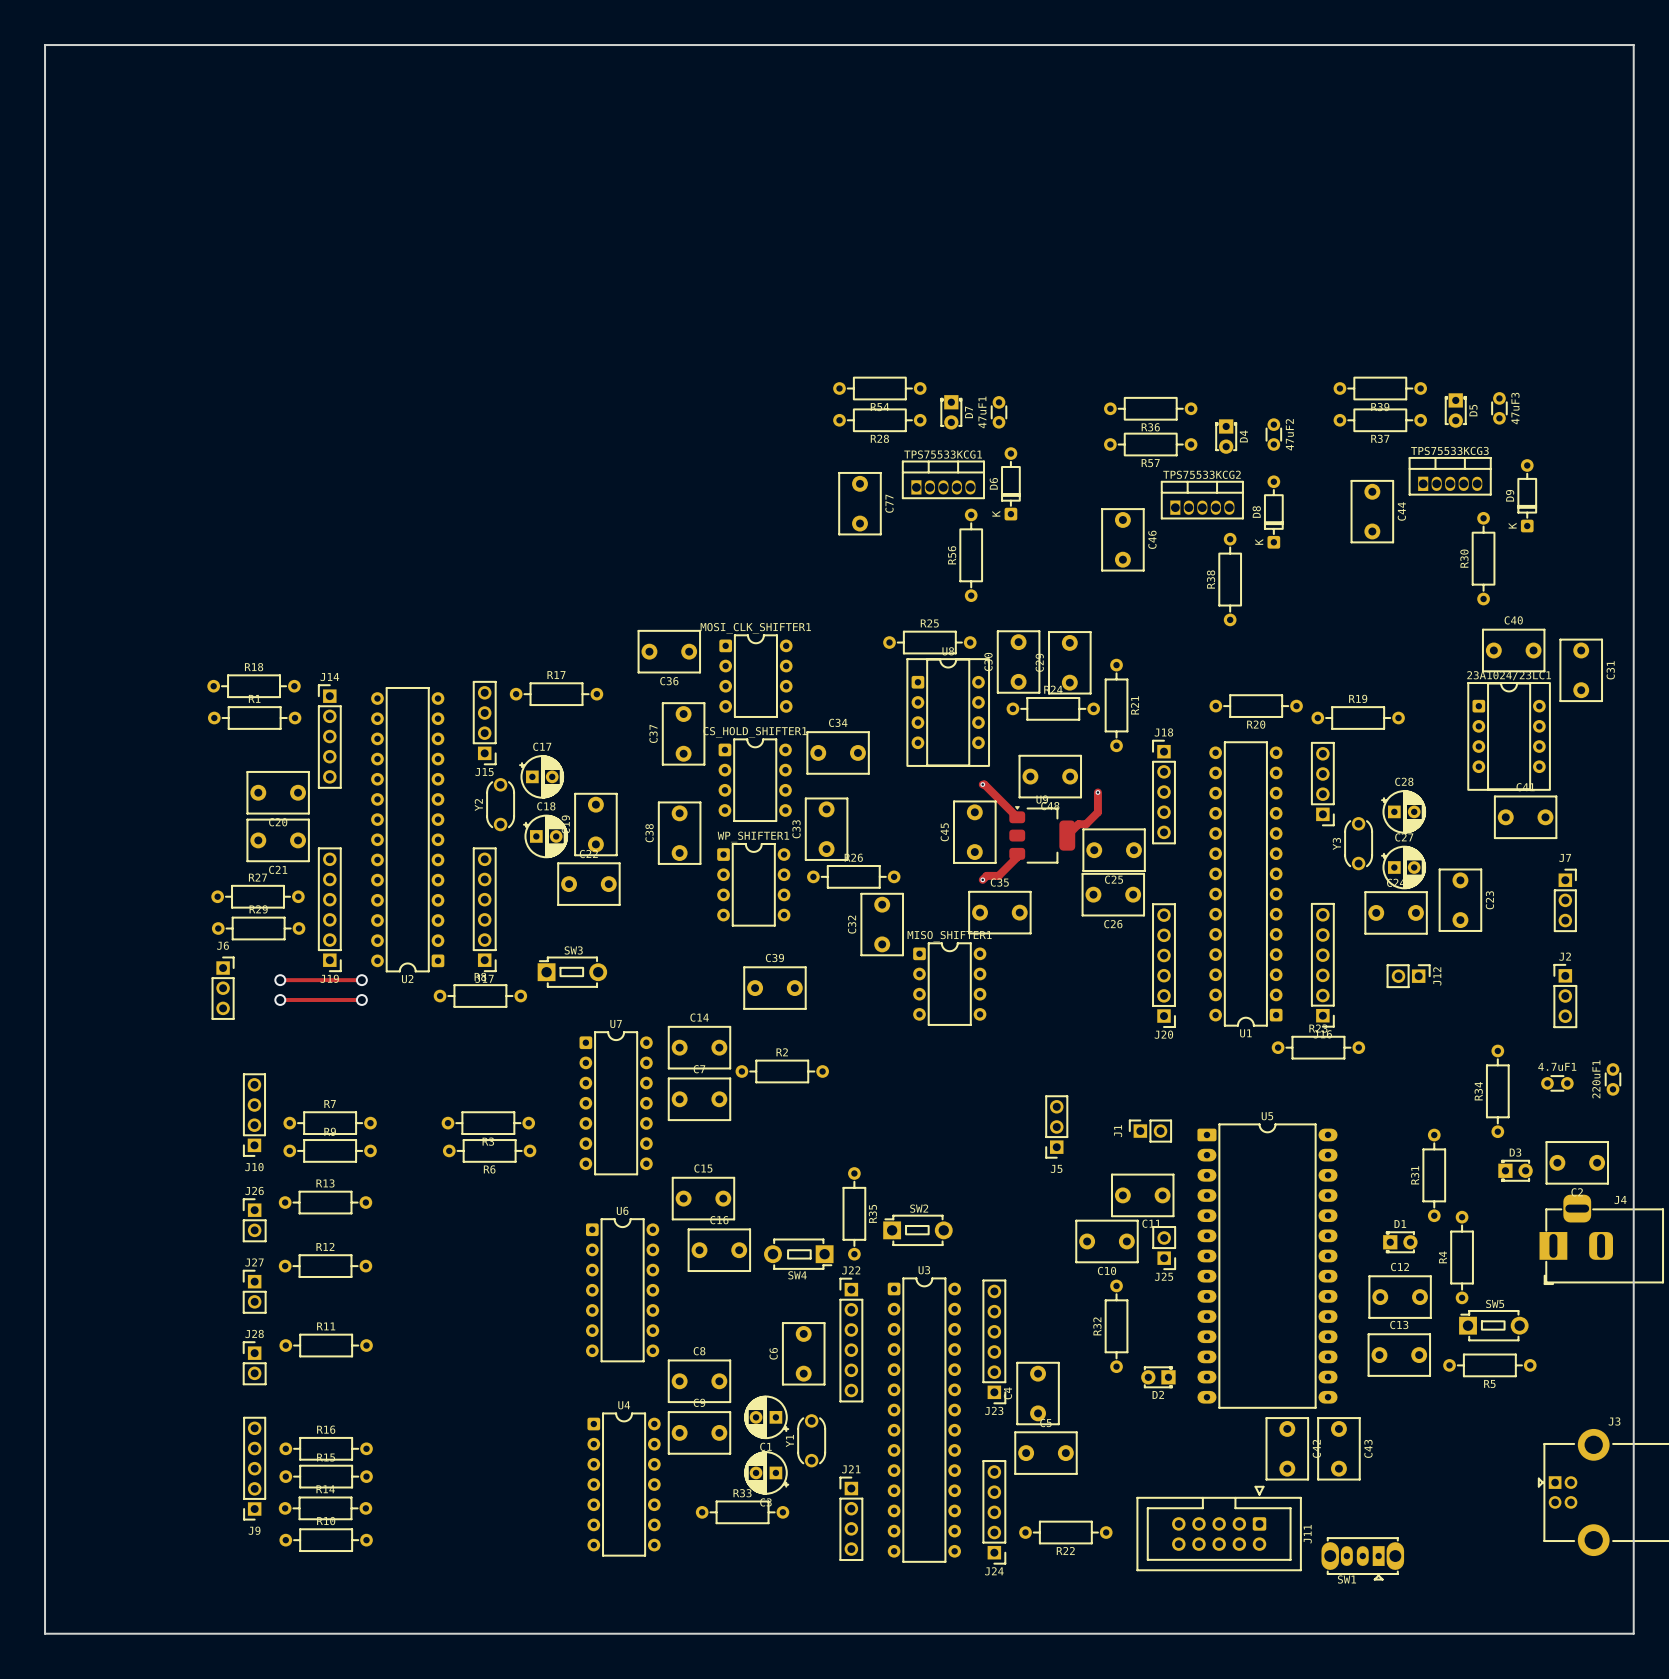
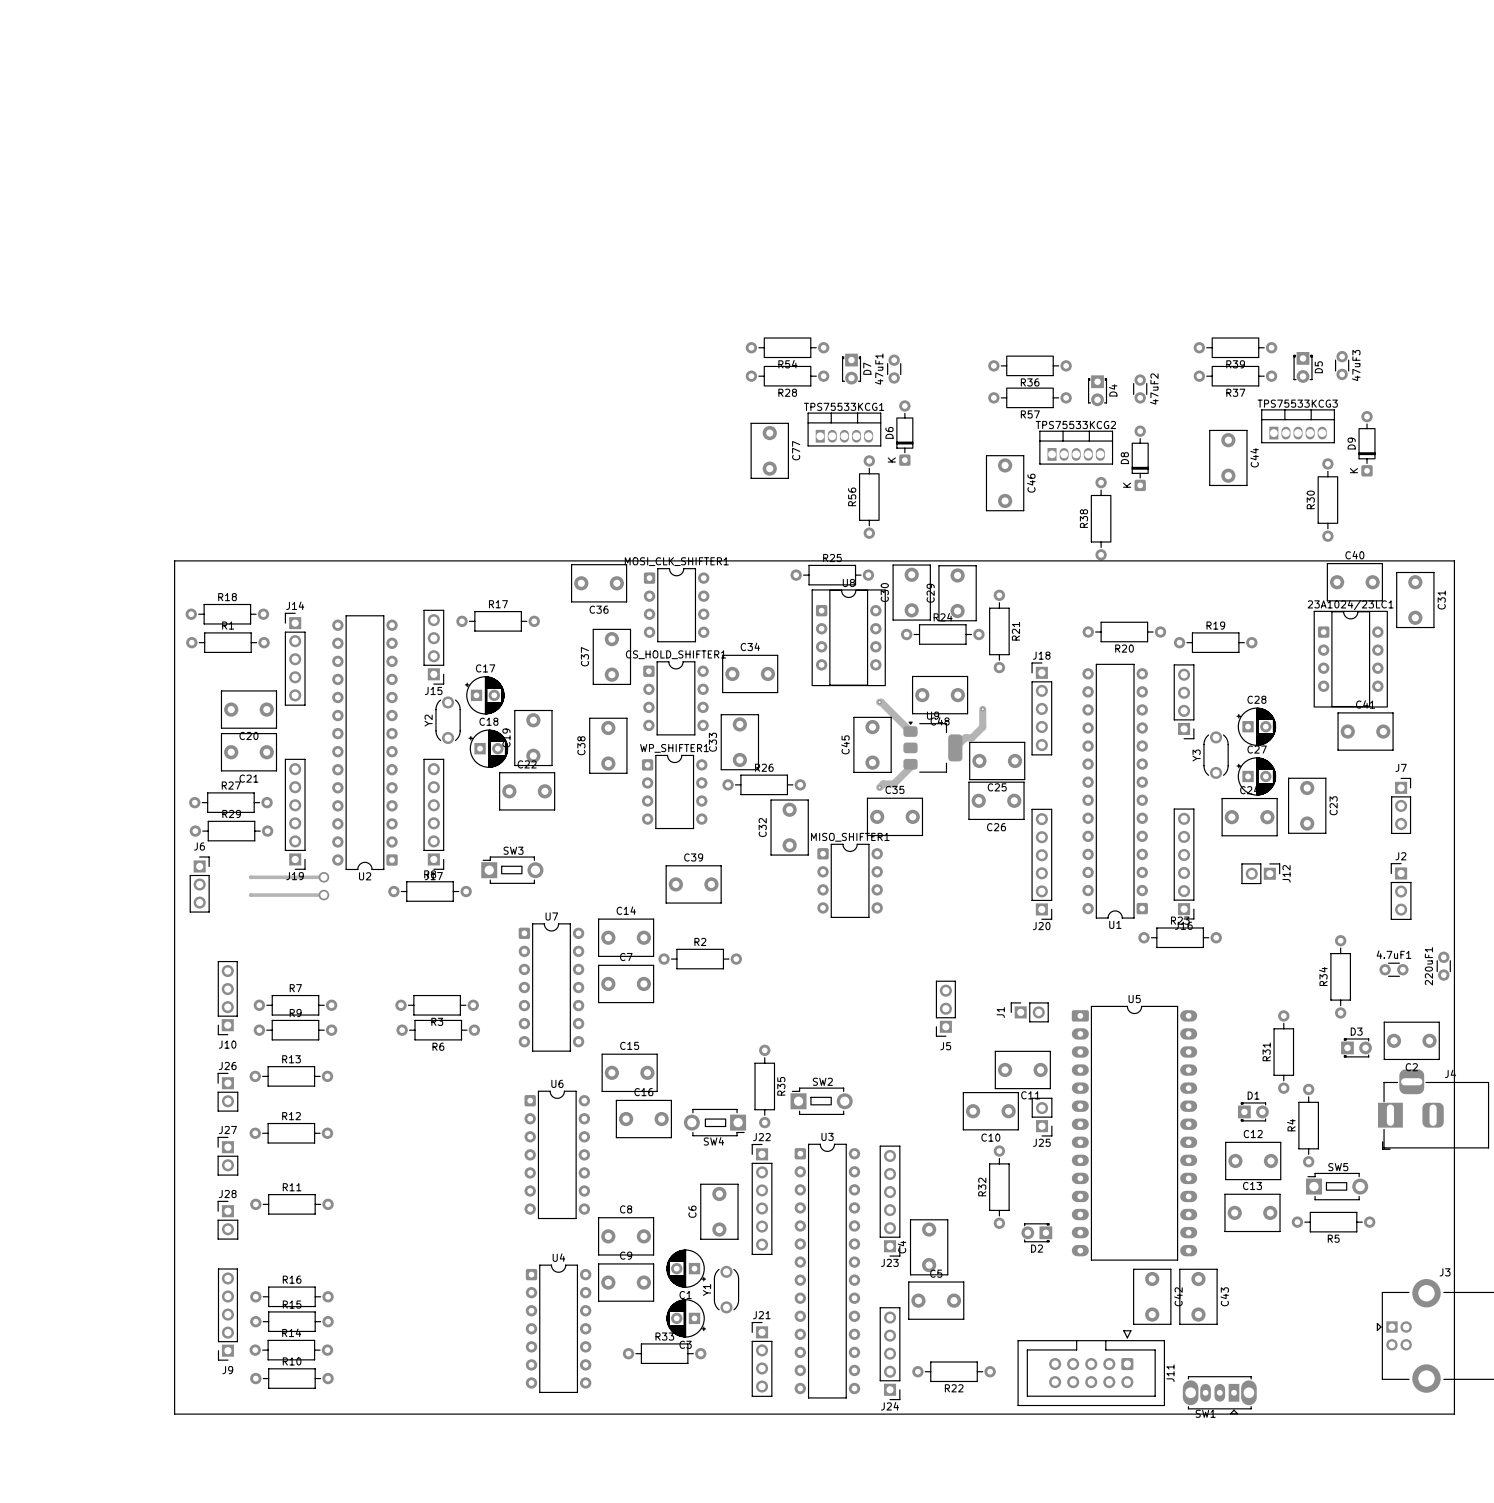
board edge: (45, 45) (1633, 45) (1633, 1633) (45, 1633) (45, 45) -> (174, 560) (174, 1414) (1454, 1414) (1454, 560) (174, 560)
via: (280, 980) -> none
via: (280, 1000) -> none

